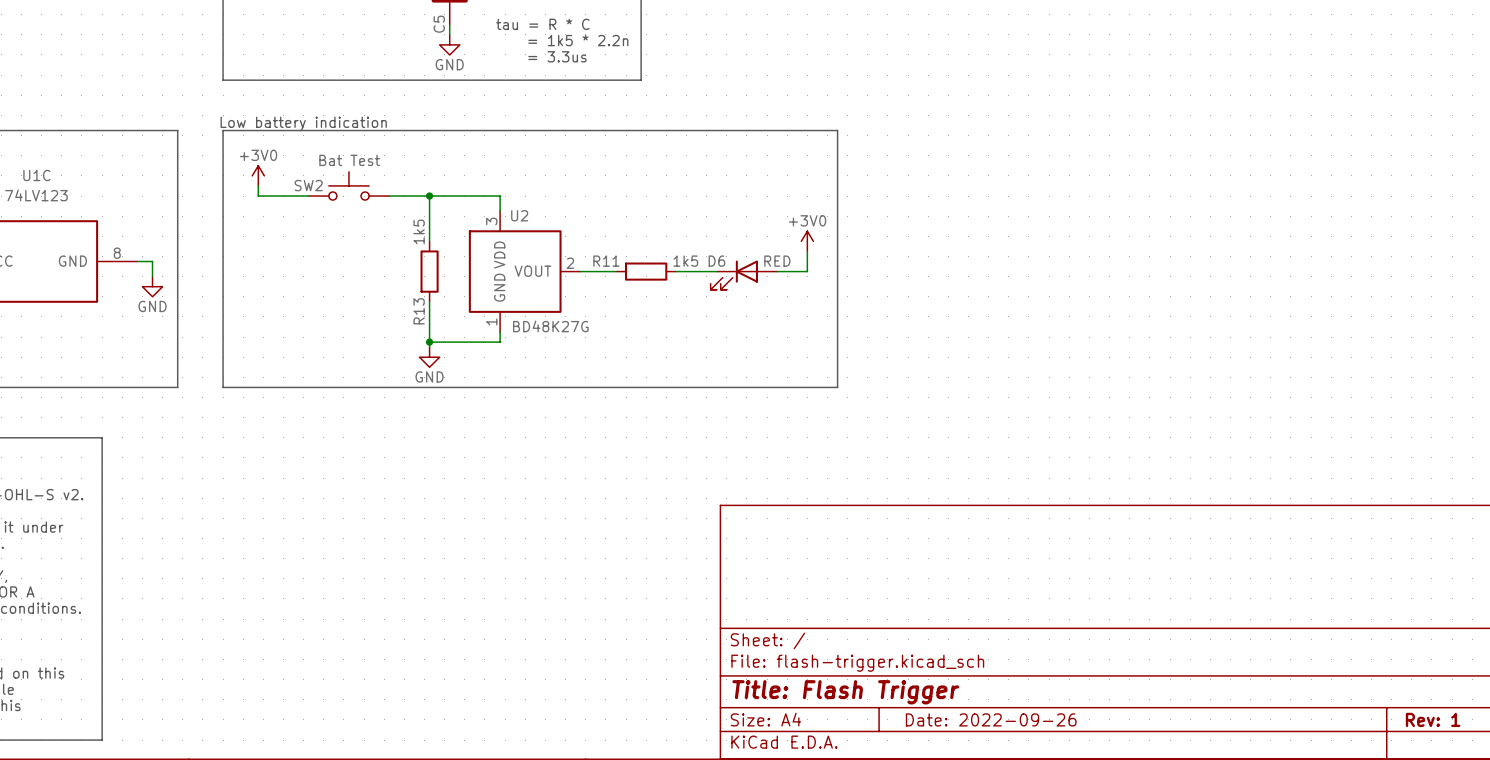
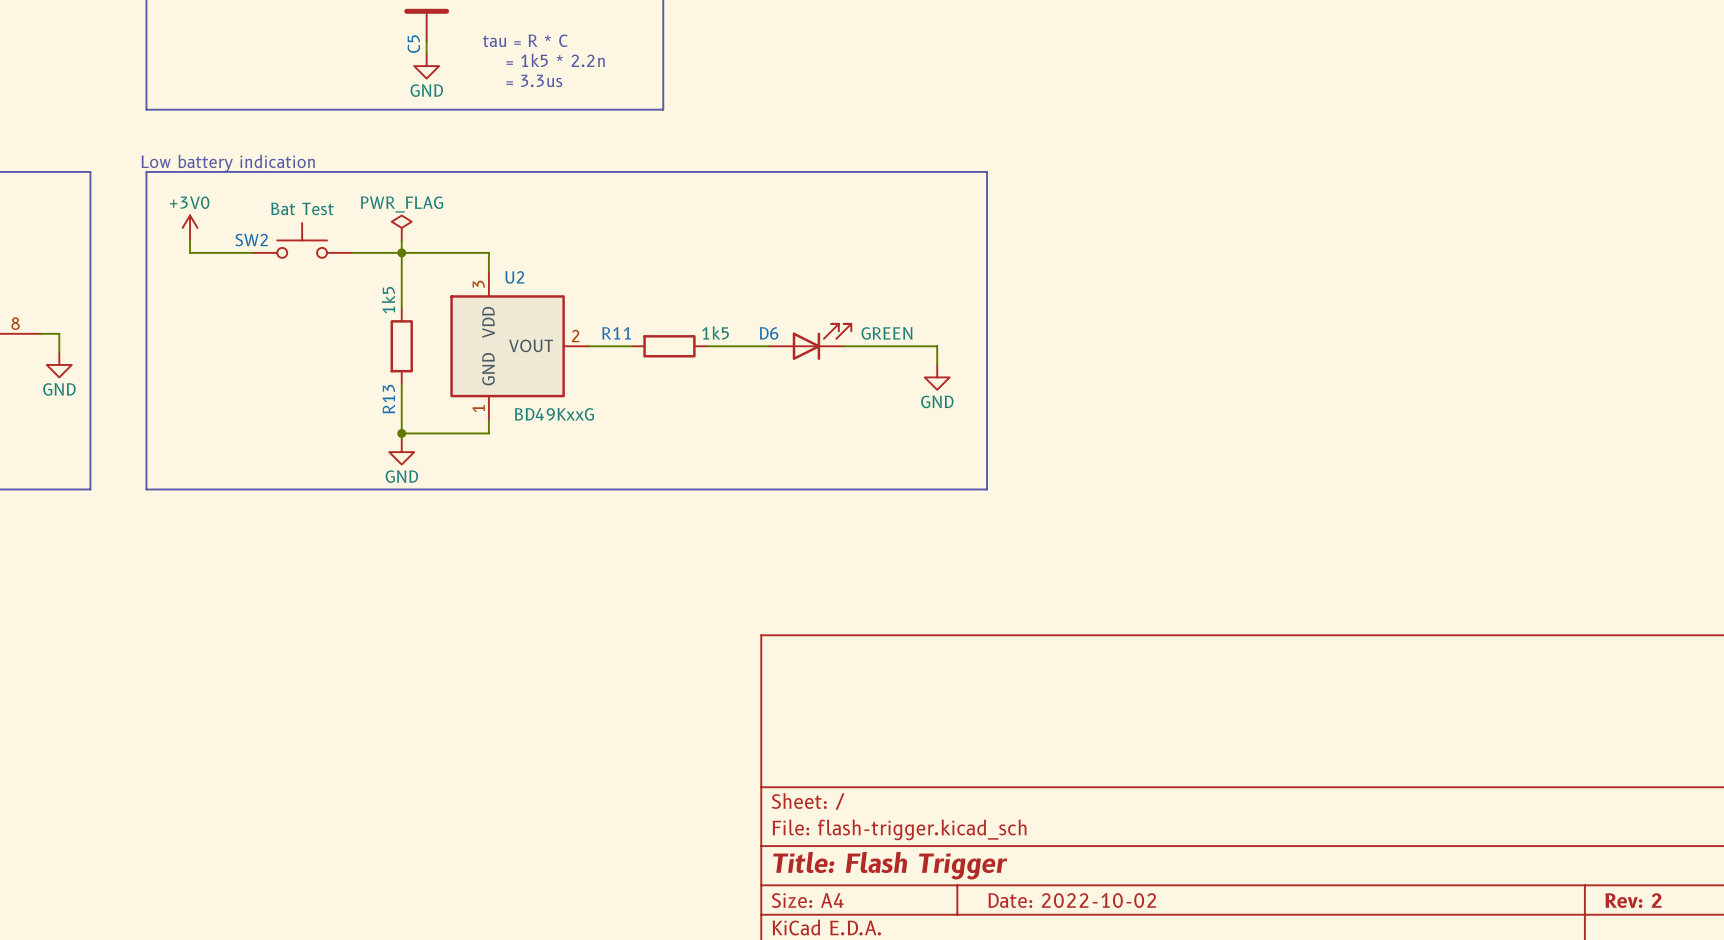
line: (837, 130) (837, 387) -> (906, 171) (987, 171) (987, 489) (906, 489)
power symbol: none -> PWR_FLAG (401, 227)
wire: none -> (401, 240) (401, 252)
power symbol: +3V0 (807, 241) -> none
wire: (807, 251) (807, 271) -> (937, 364) (937, 346) (868, 346)
D6 value: RED (777, 261) -> GREEN (886, 333)
D6 rotation: 0° (734, 275) -> 180° (822, 341)
power symbol: none -> GND (937, 377)
U2 value: BD48K27G (550, 326) -> BD49KxxG (554, 414)
title block: Date: 2022-09-26 (991, 719) -> Date: 2022-10-02 (1072, 900)
title block: Rev: 1 (1433, 719) -> Rev: 2 (1633, 900)

